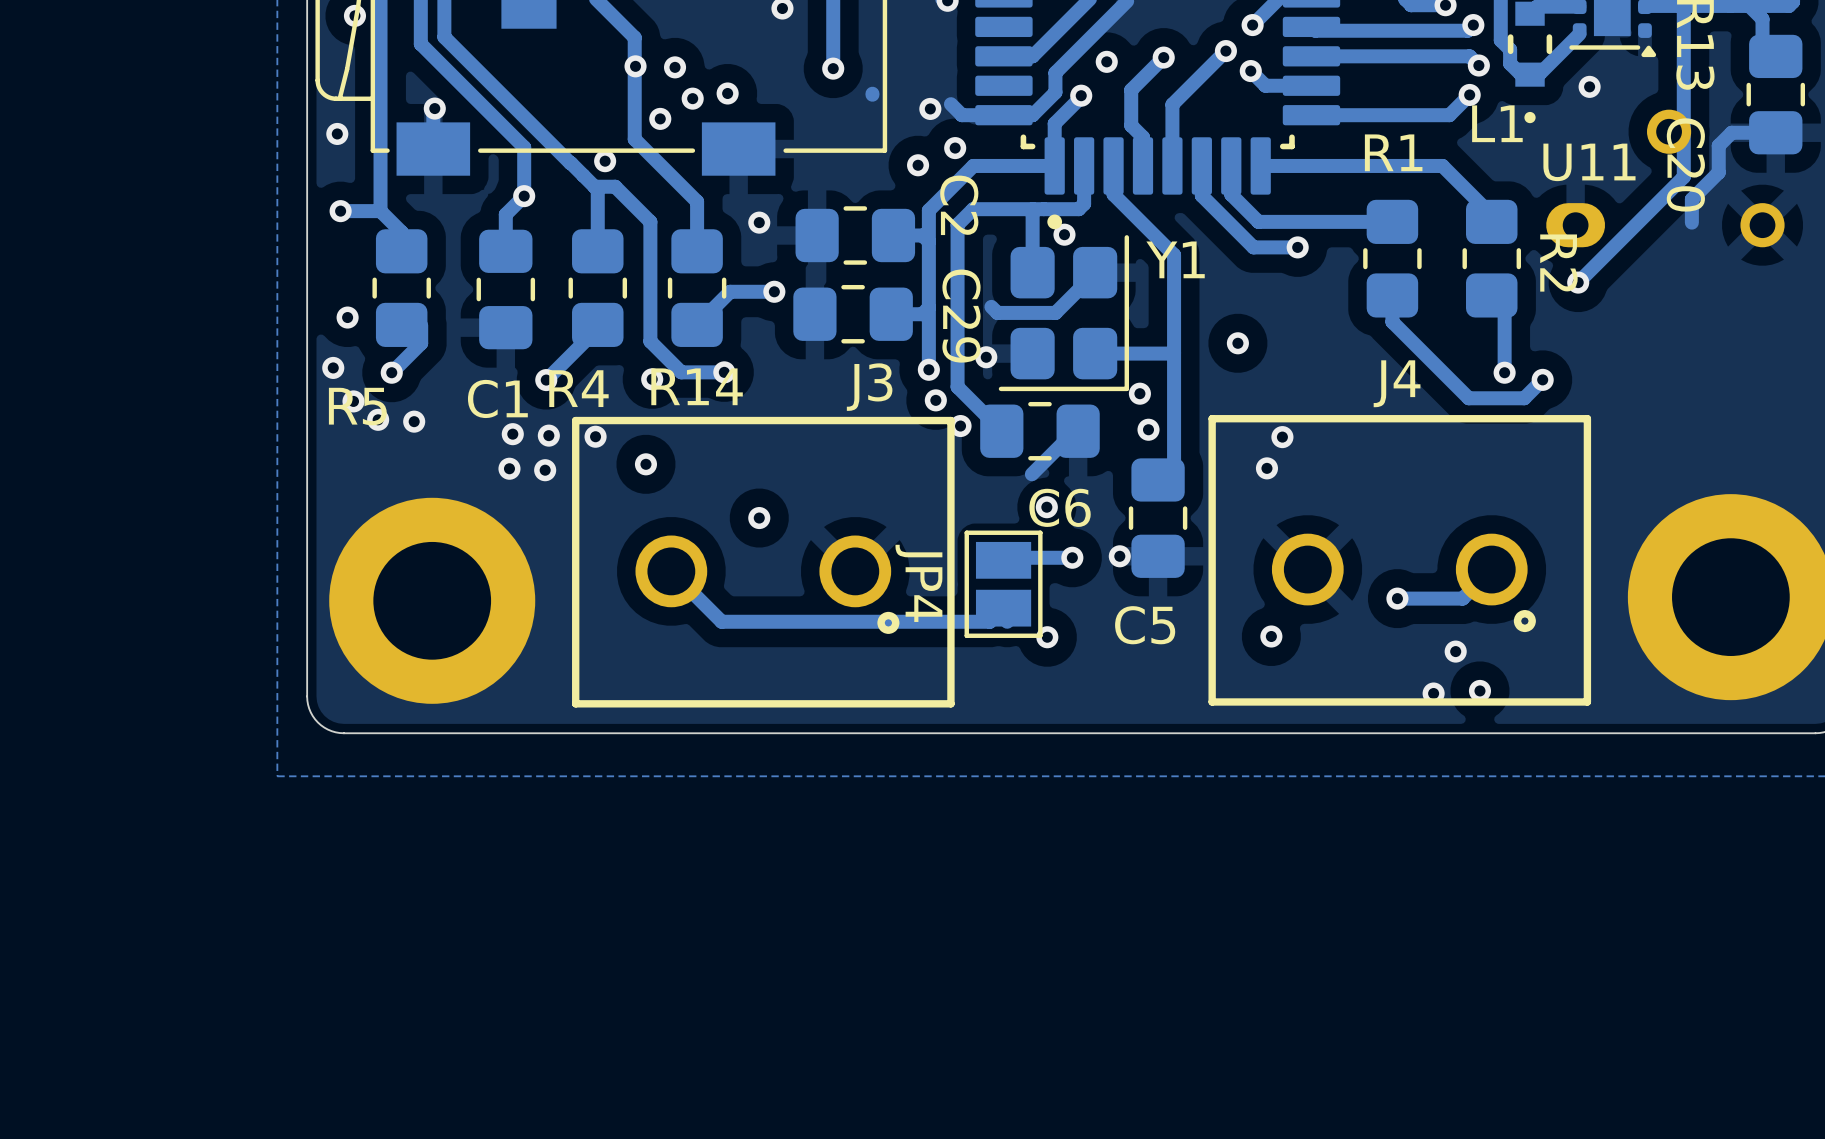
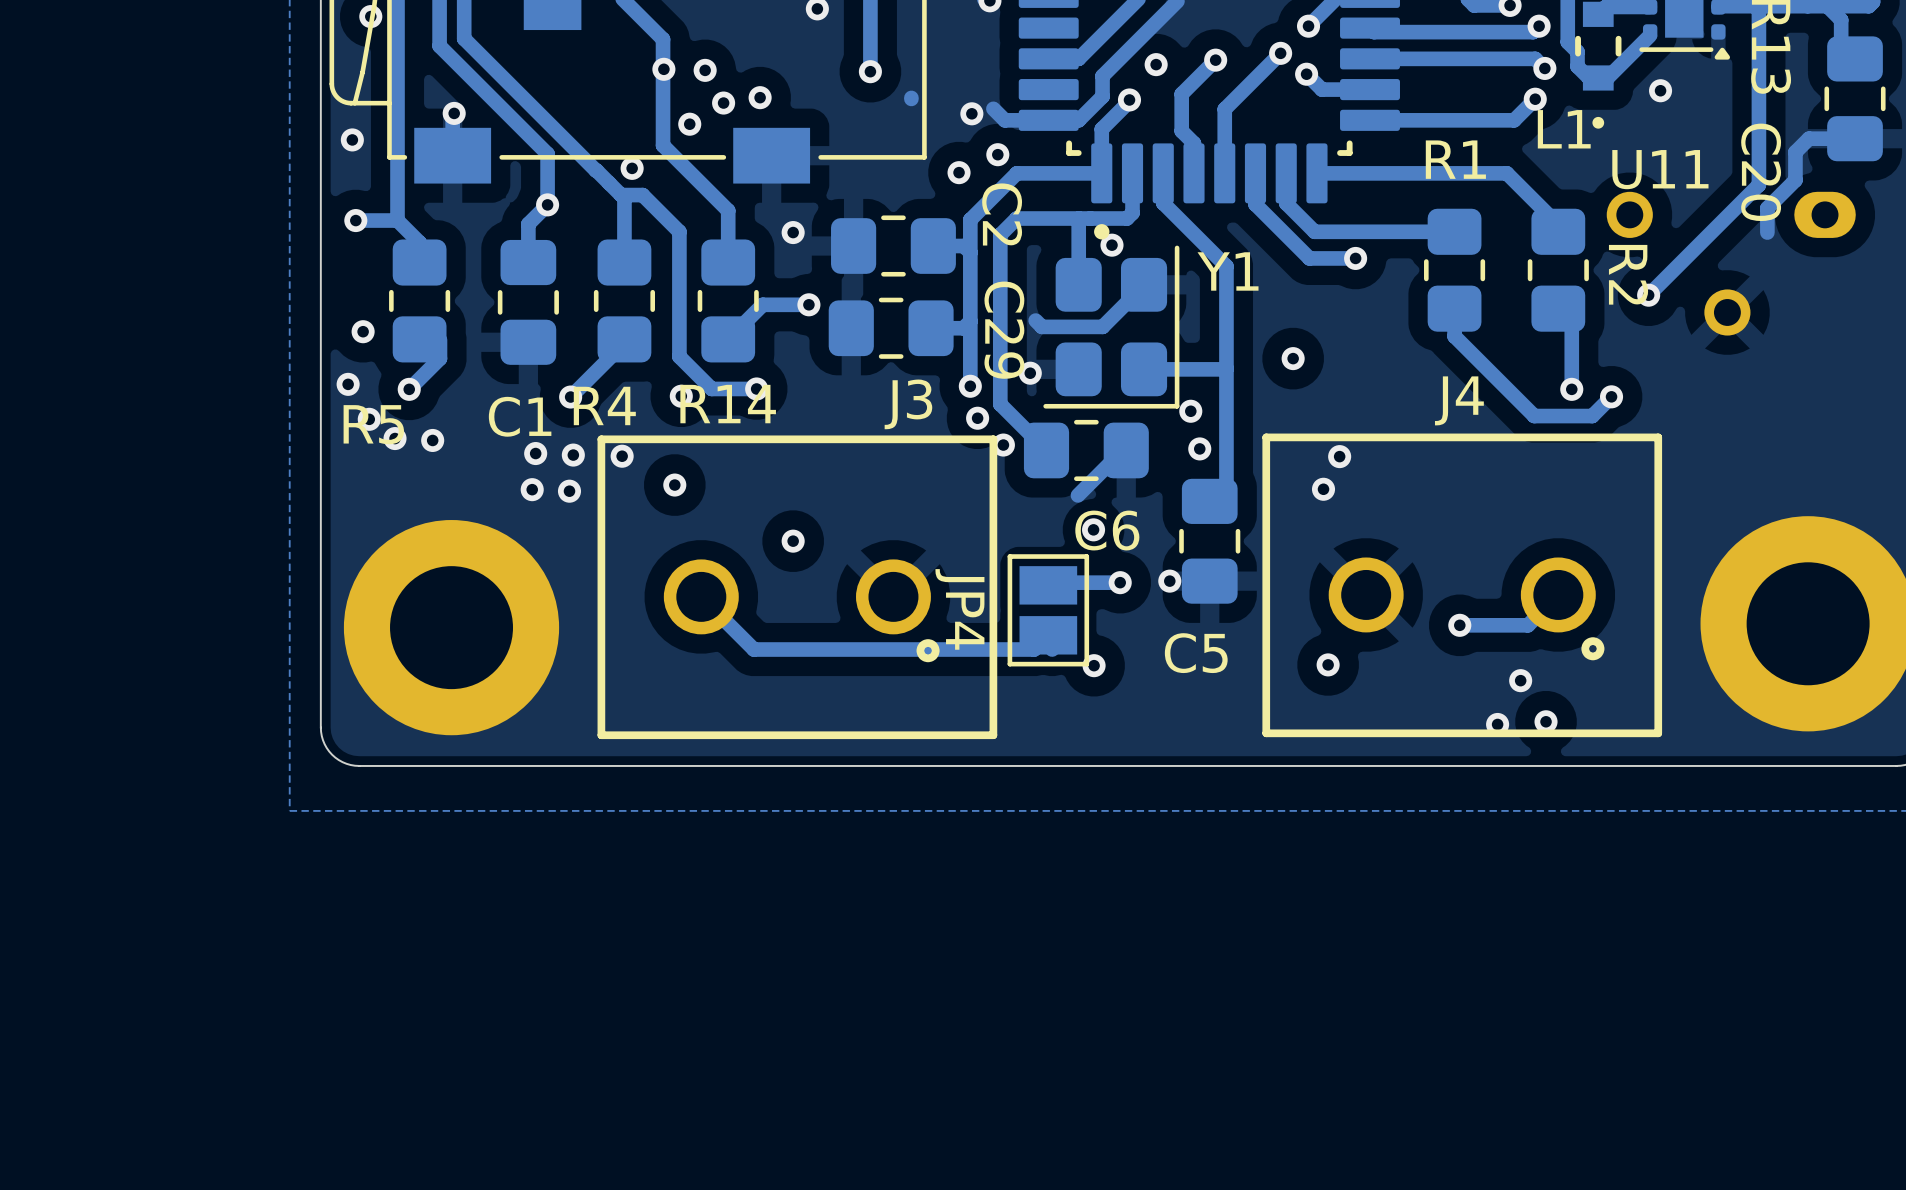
part rotation: 0° (1665, 178) -> 180° (1731, 263)

